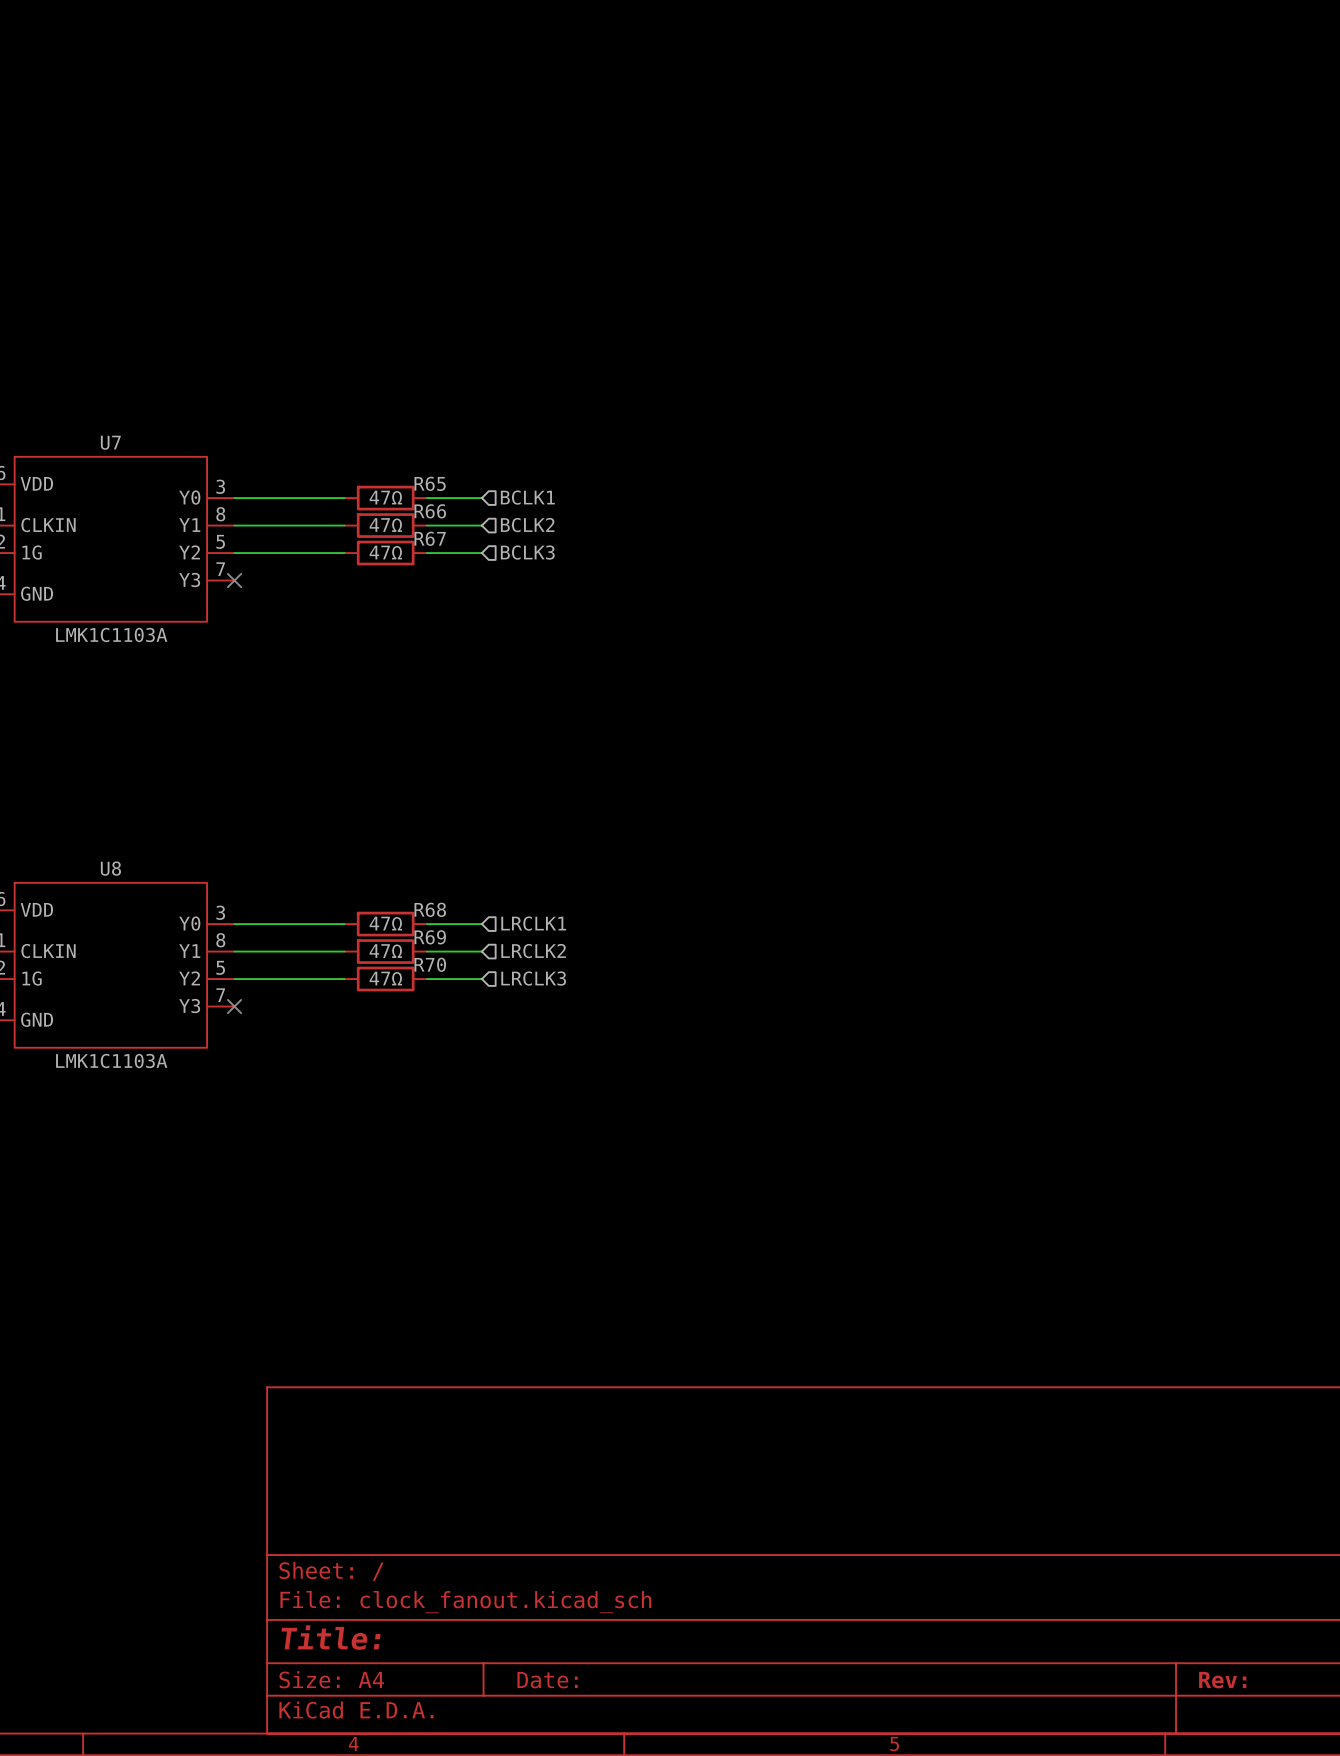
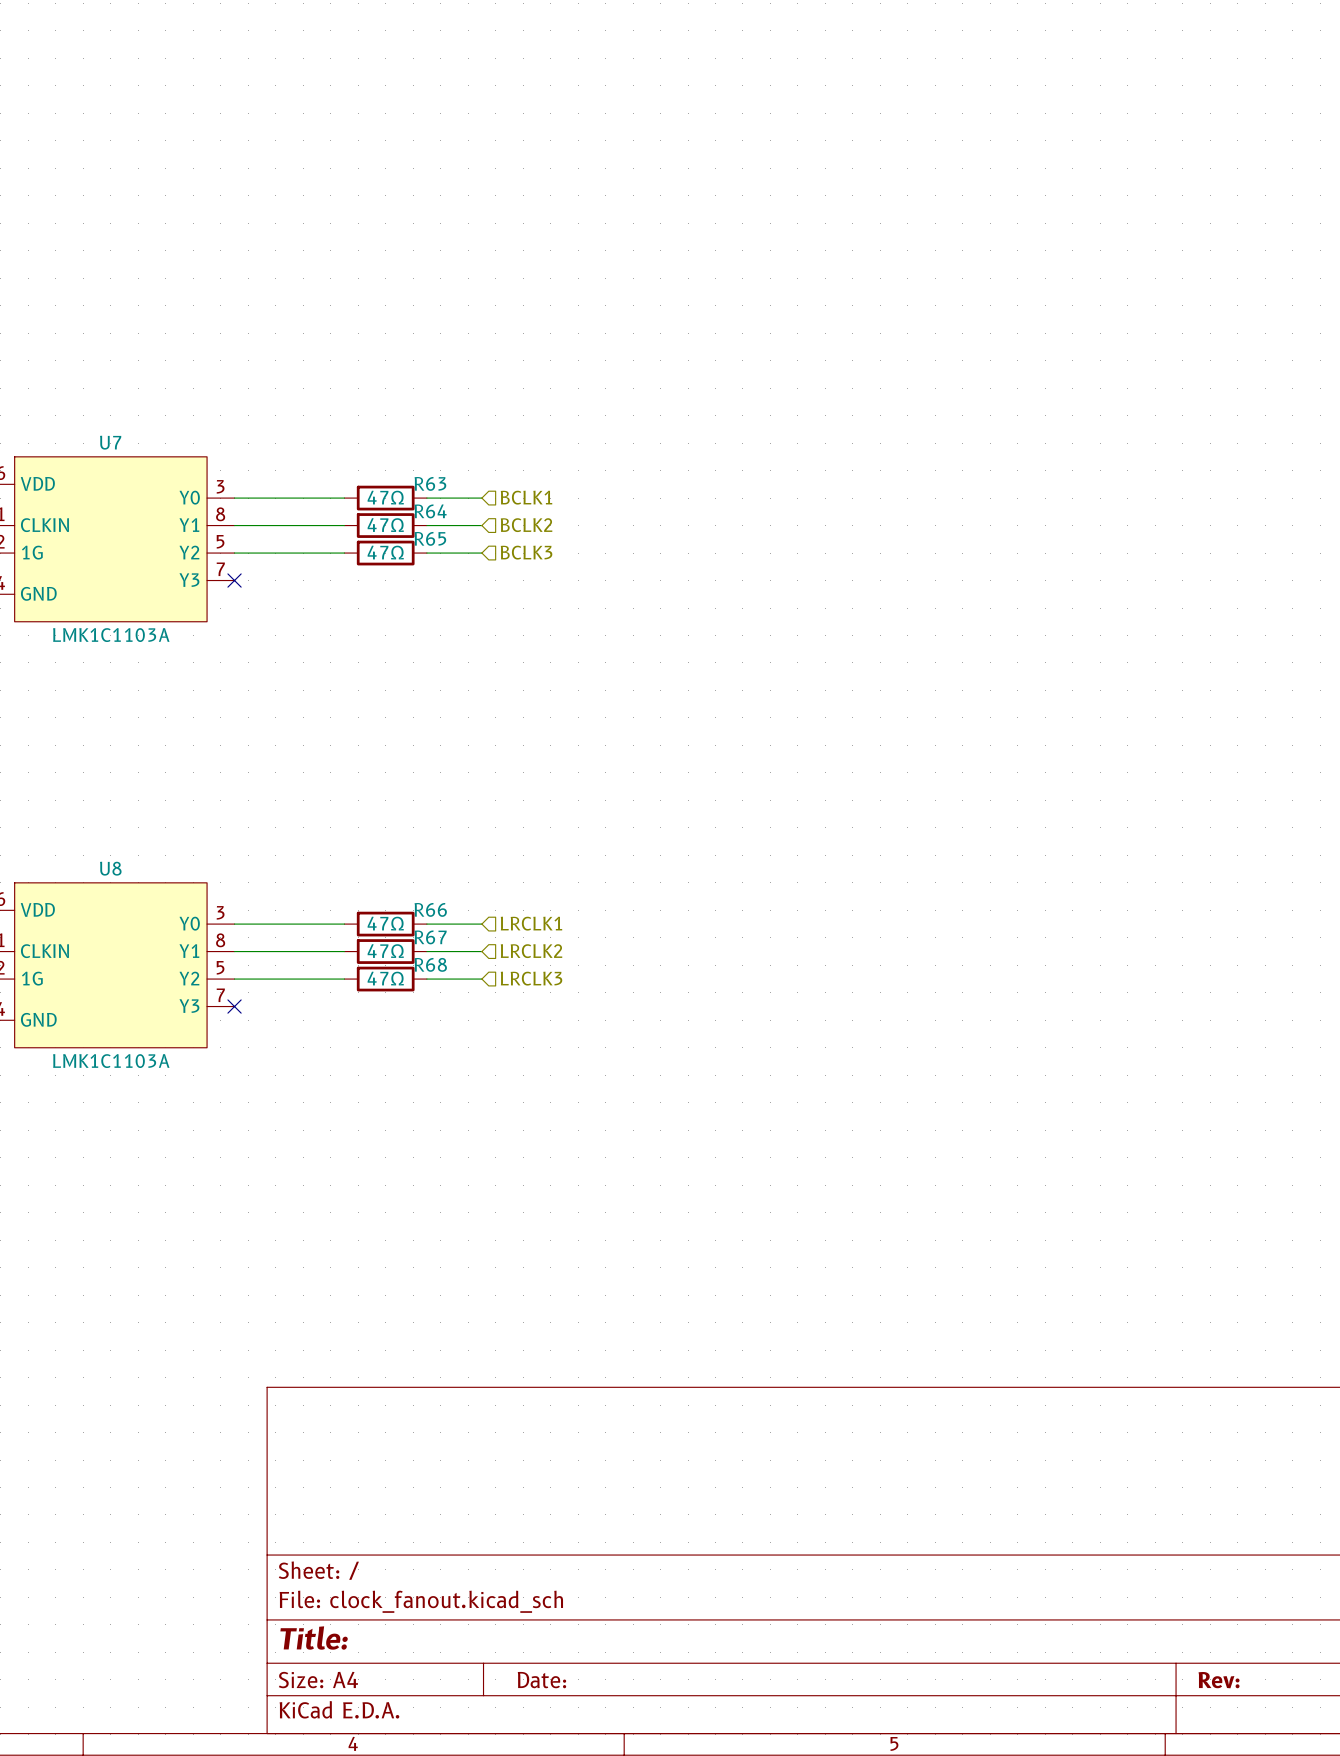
R65 name: R65 (430, 483) -> R63 (430, 483)
R66 name: R66 (430, 511) -> R64 (430, 511)
R67 name: R67 (430, 538) -> R65 (430, 538)
R68 name: R68 (430, 909) -> R66 (430, 909)
R69 name: R69 (430, 937) -> R67 (430, 937)
R70 name: R70 (430, 964) -> R68 (430, 964)

